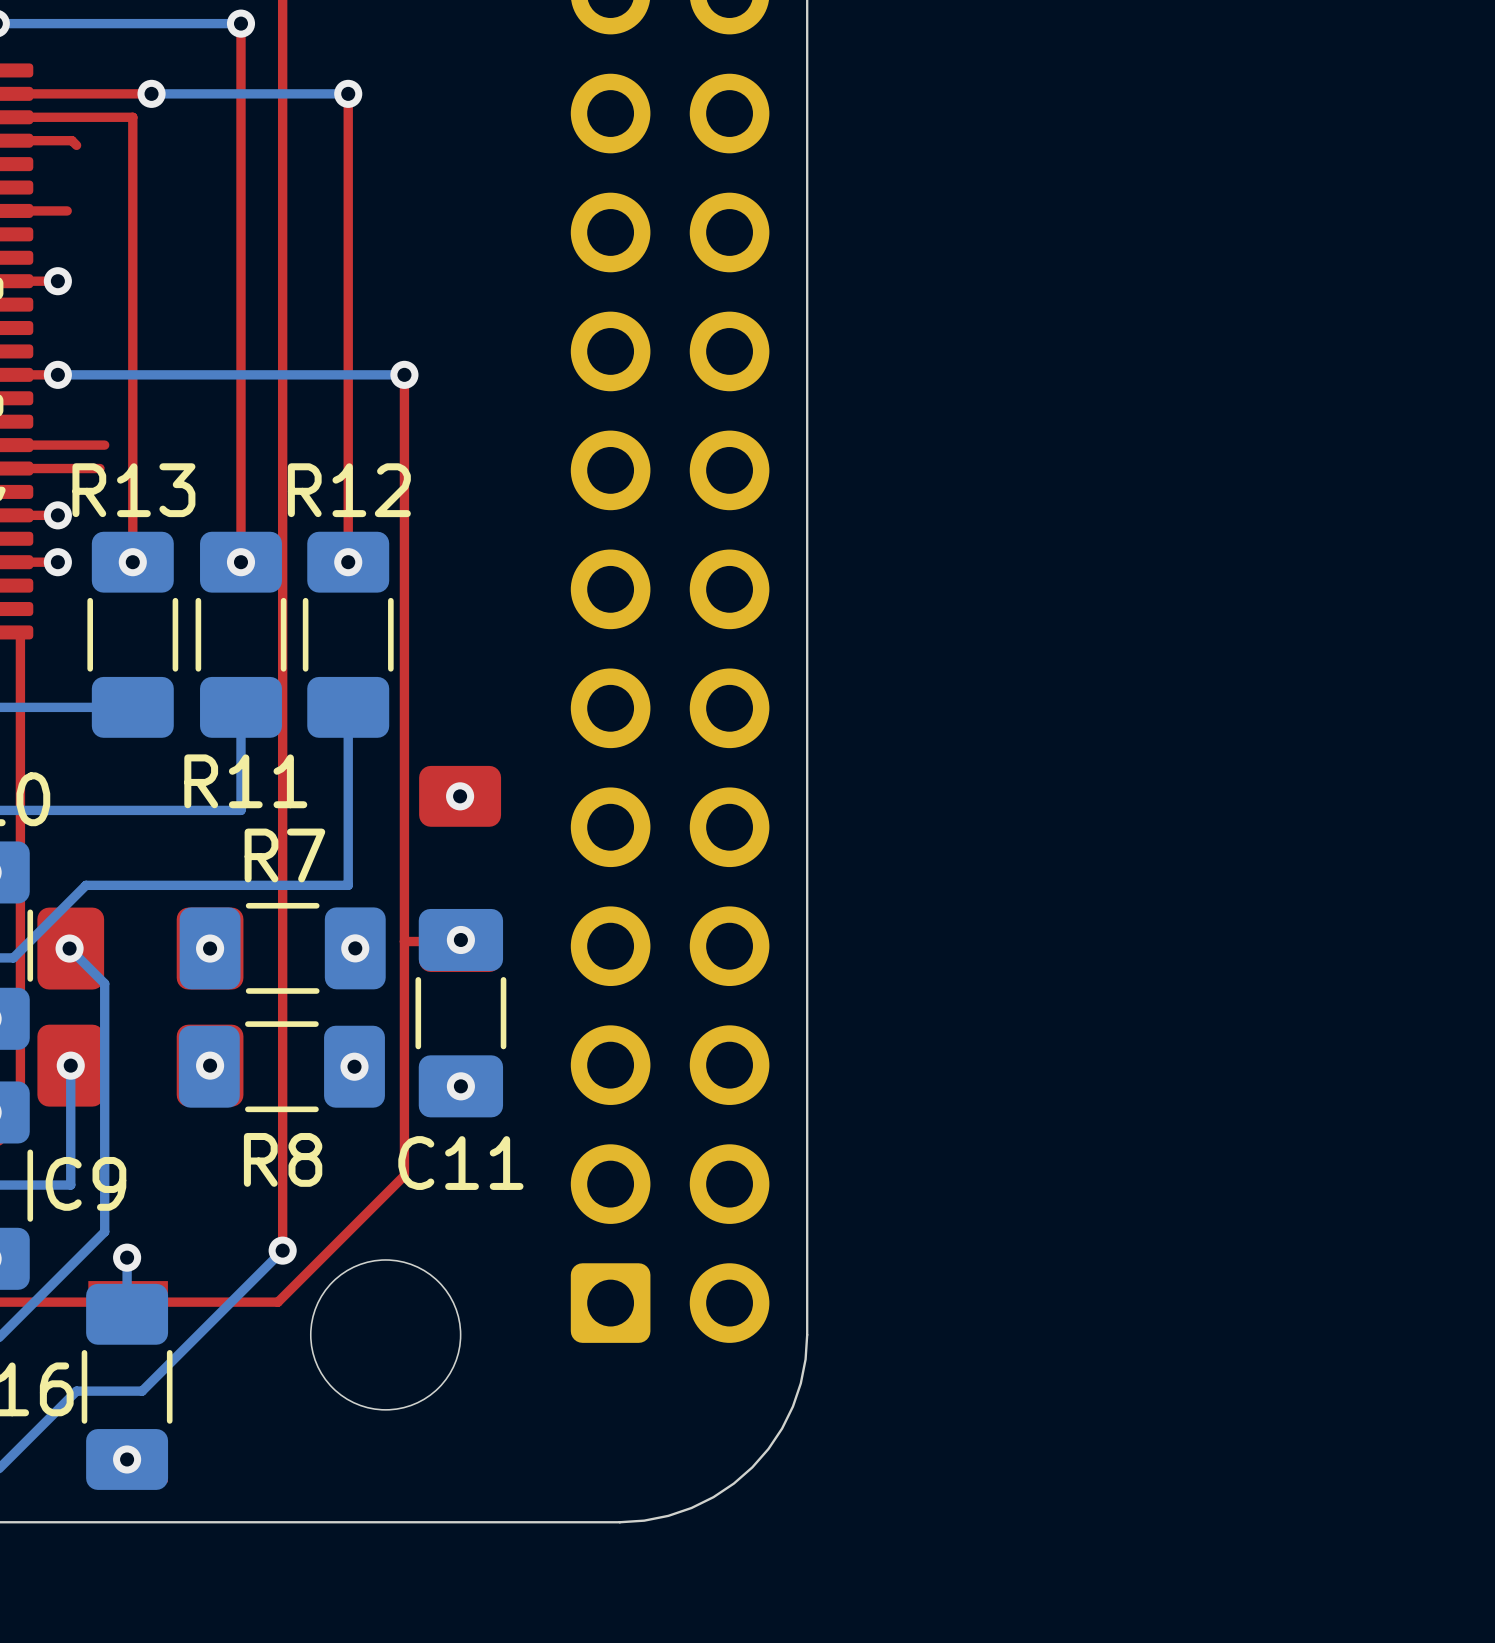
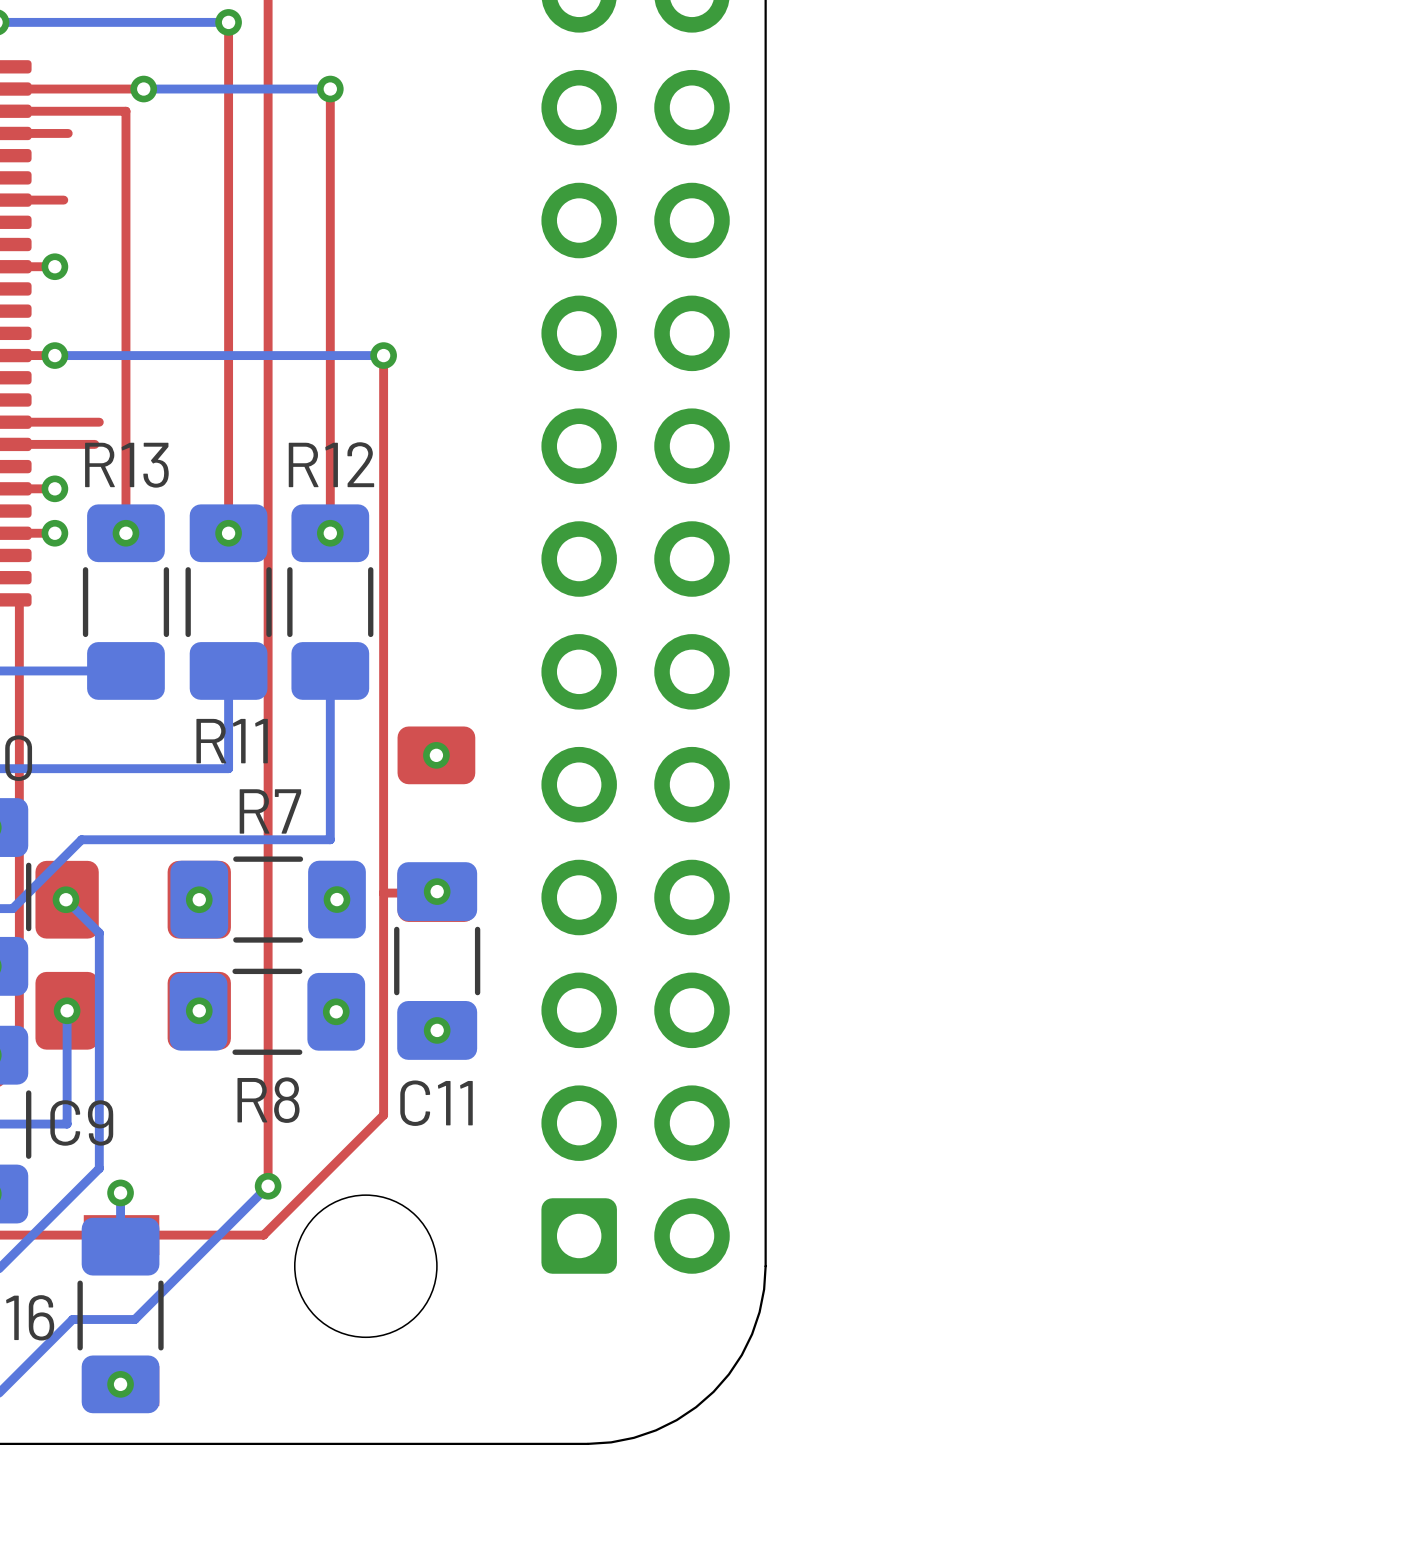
top track: (71, 140) (76, 145) -> none

